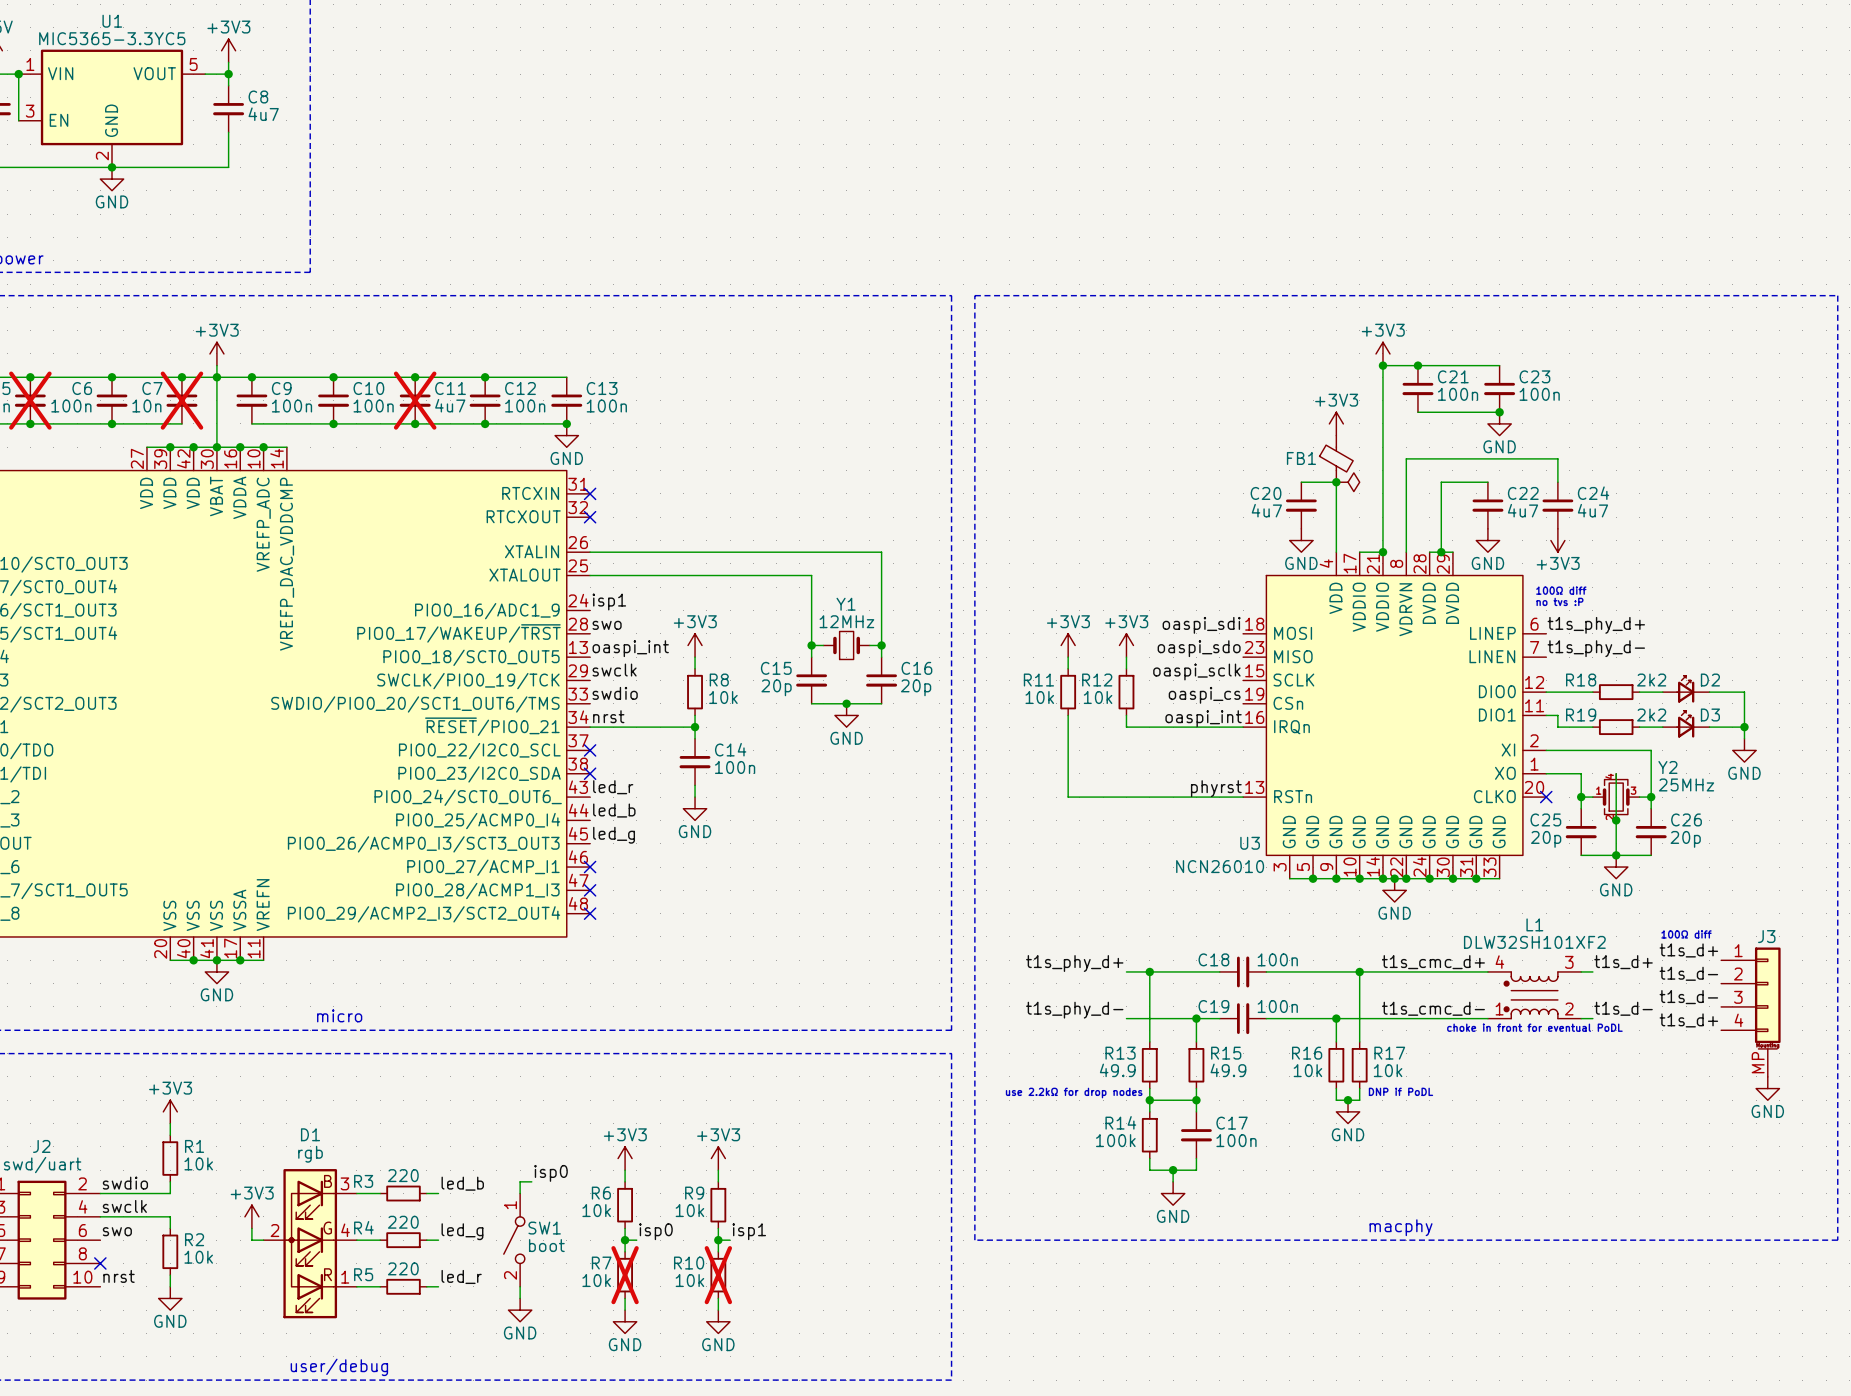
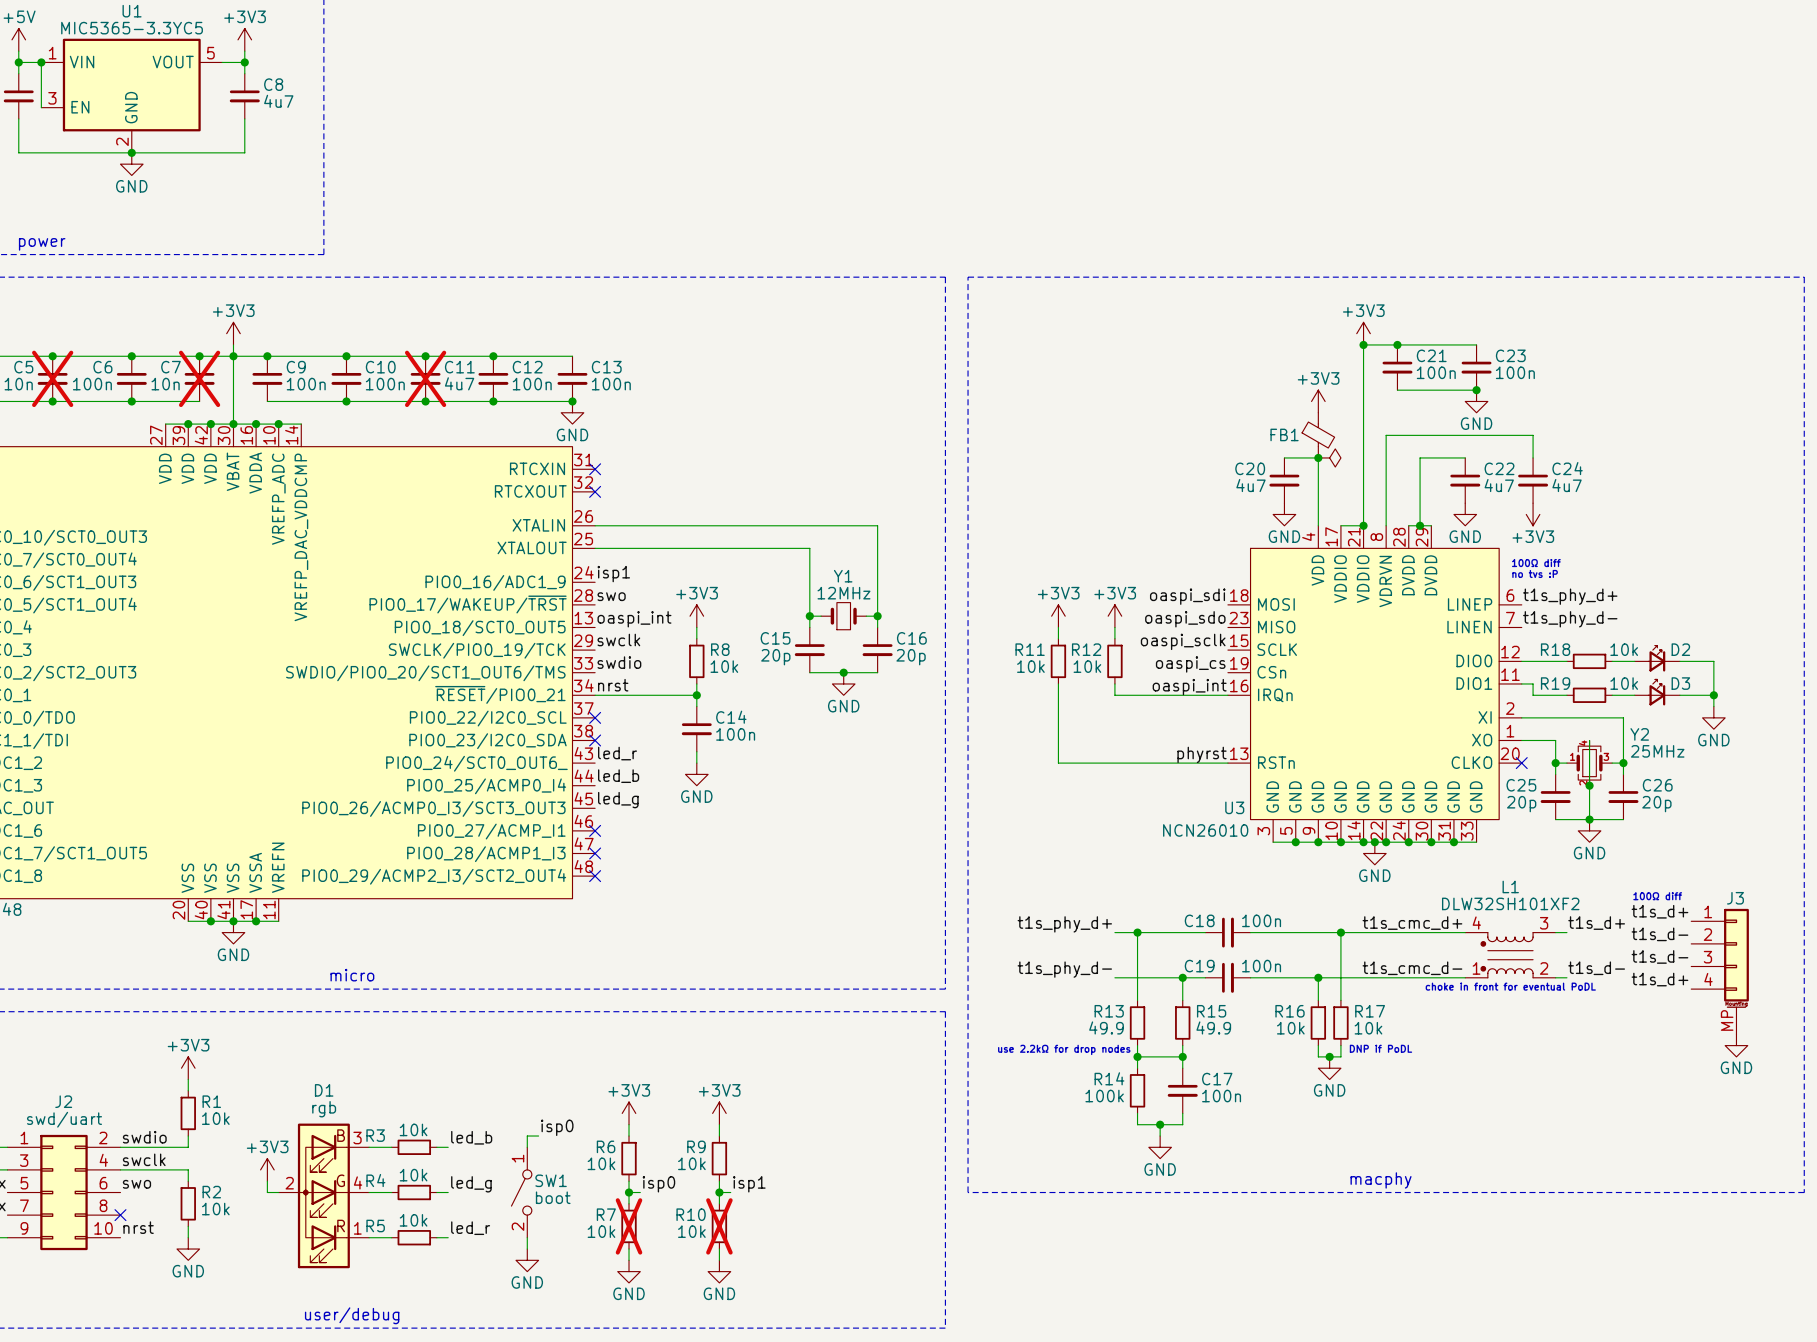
R18 value: 2k2 (1651, 680) -> 10k (1624, 649)
R19 value: 2k2 (1651, 715) -> 10k (1624, 683)
R3 value: 220 (403, 1175) -> 10k (413, 1129)
R4 value: 220 (403, 1222) -> 10k (413, 1175)
R5 value: 220 (403, 1268) -> 10k (413, 1220)

